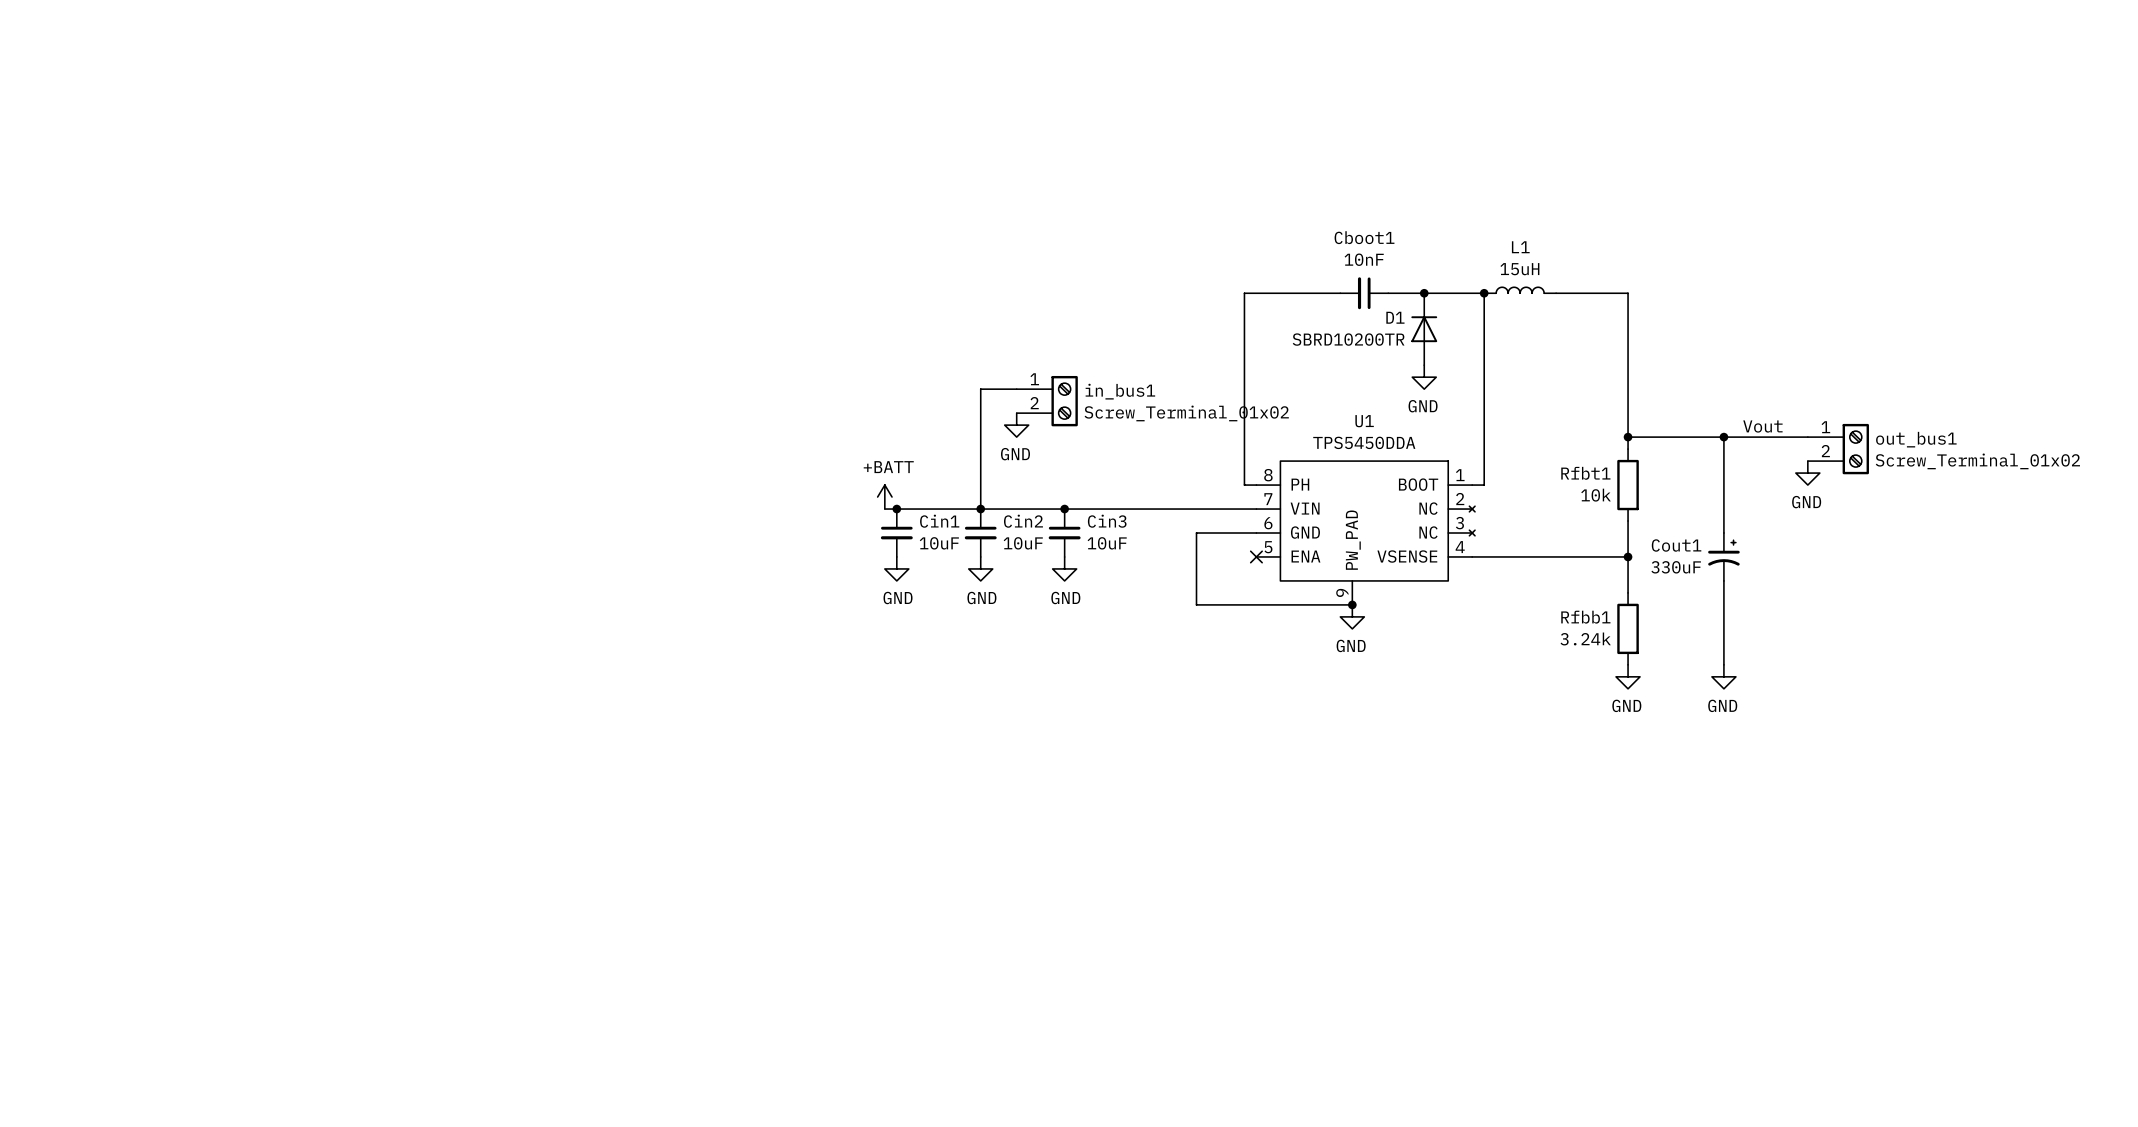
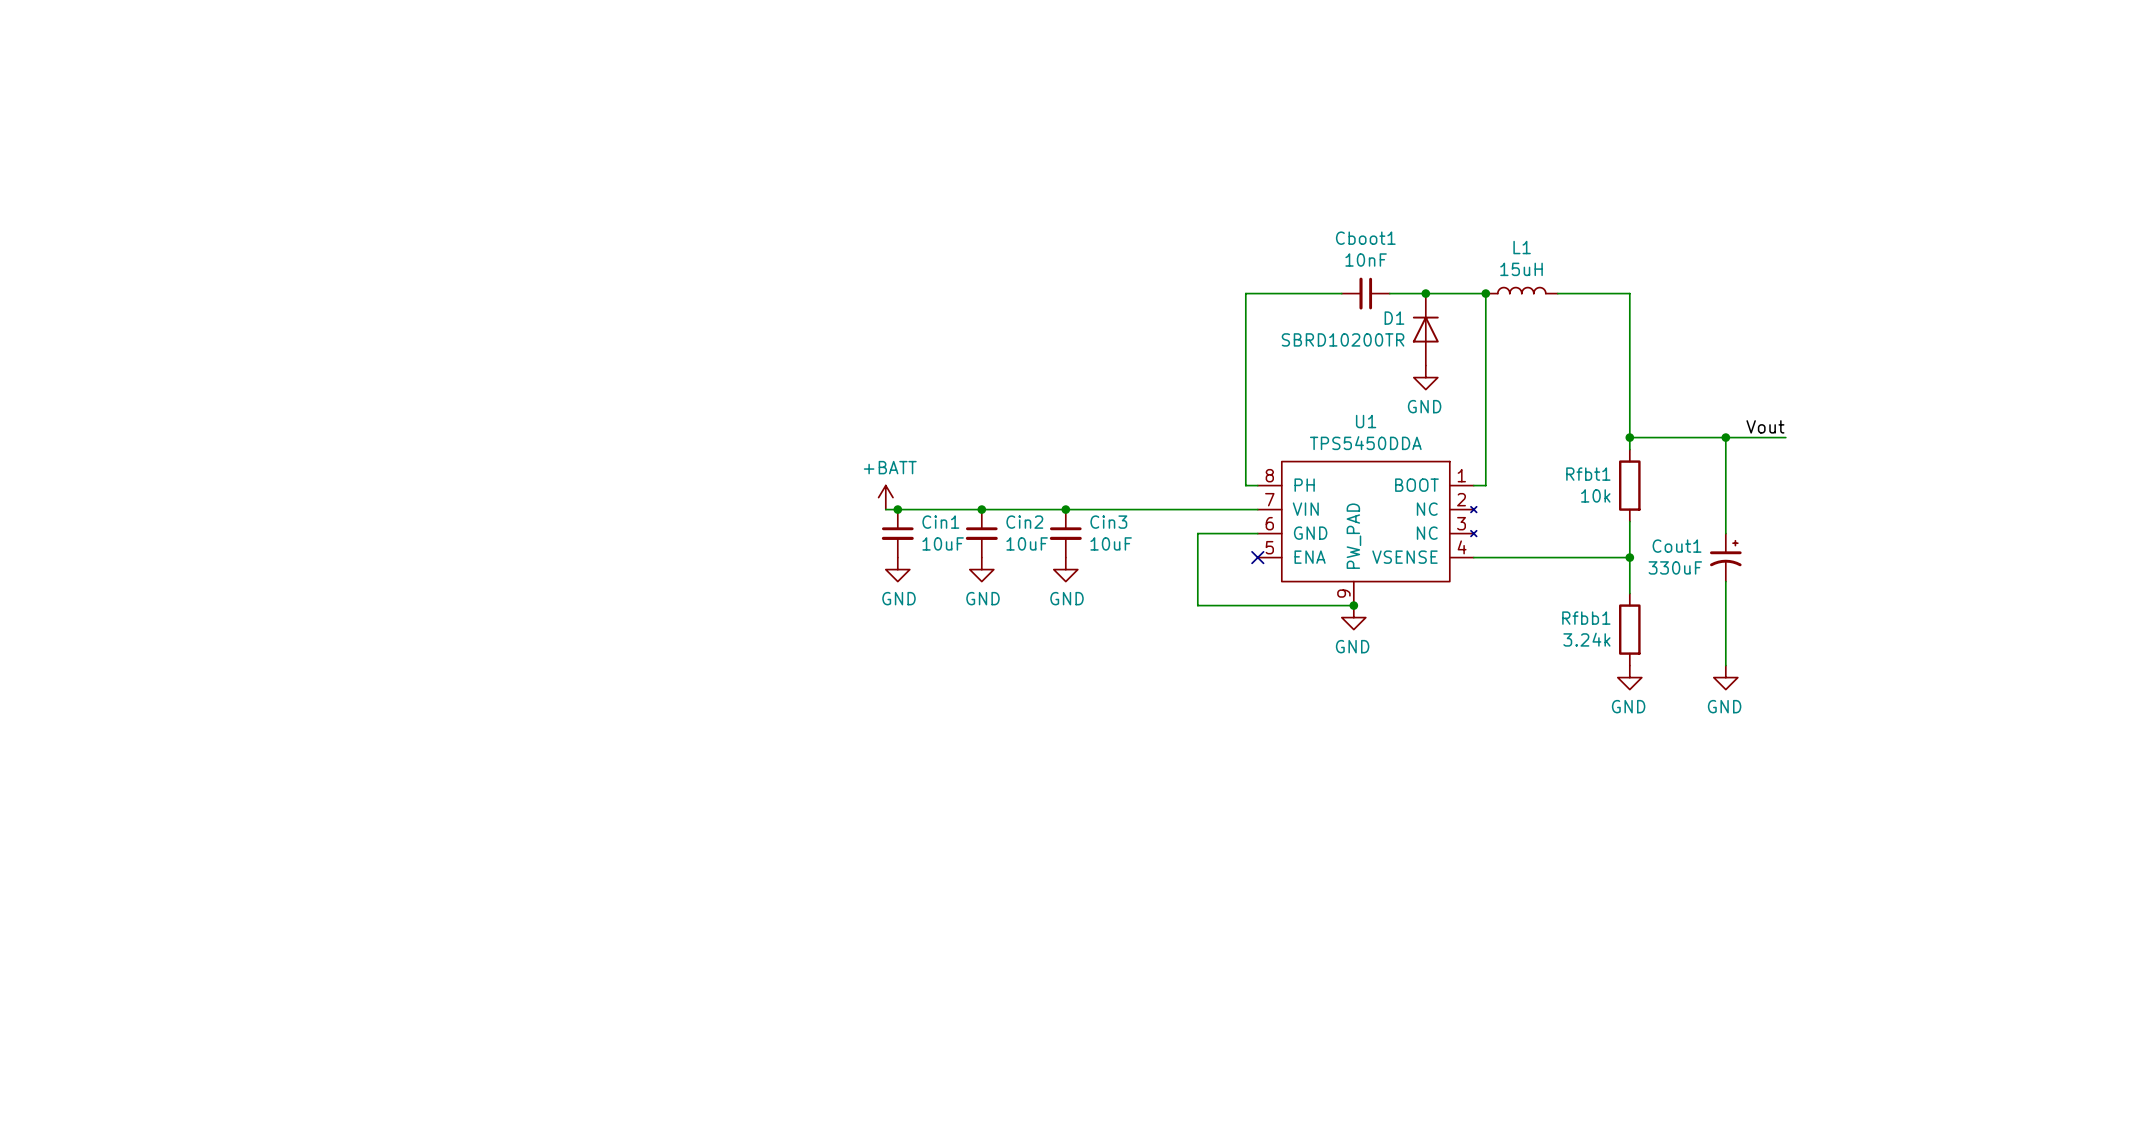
wire: (1016, 389) (980, 389) (980, 509) -> none
in_bus1: Screw_Terminal_01x02 (1047, 401) -> none
power symbol: GND (1016, 425) -> none
wire: (1783, 437) (1807, 437) -> none
out_bus1: Screw_Terminal_01x02 (1838, 449) -> none
power symbol: GND (1807, 473) -> none

